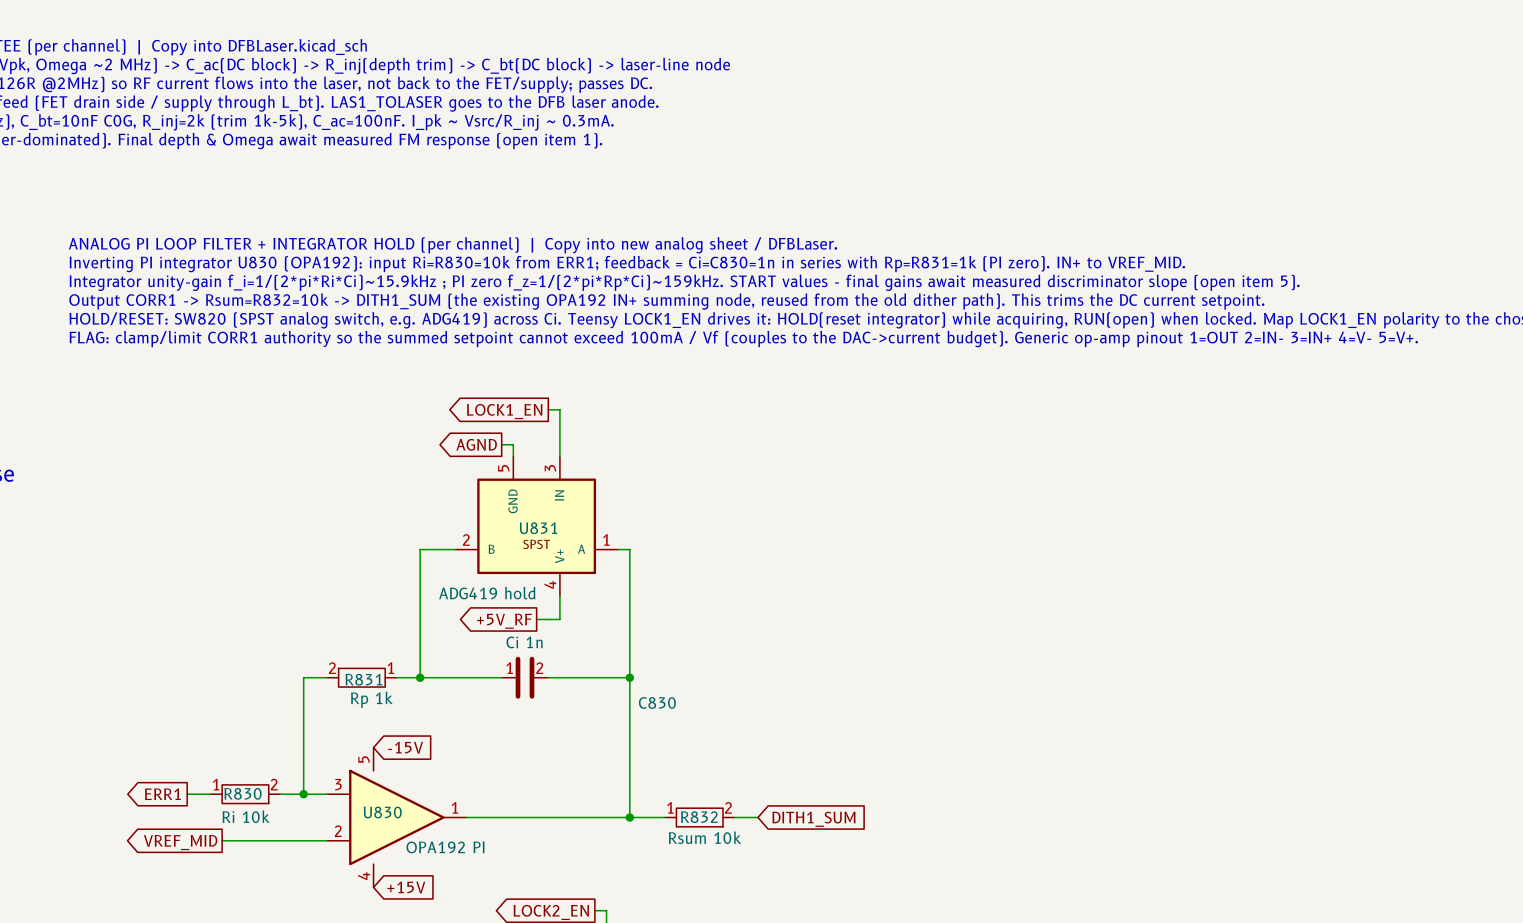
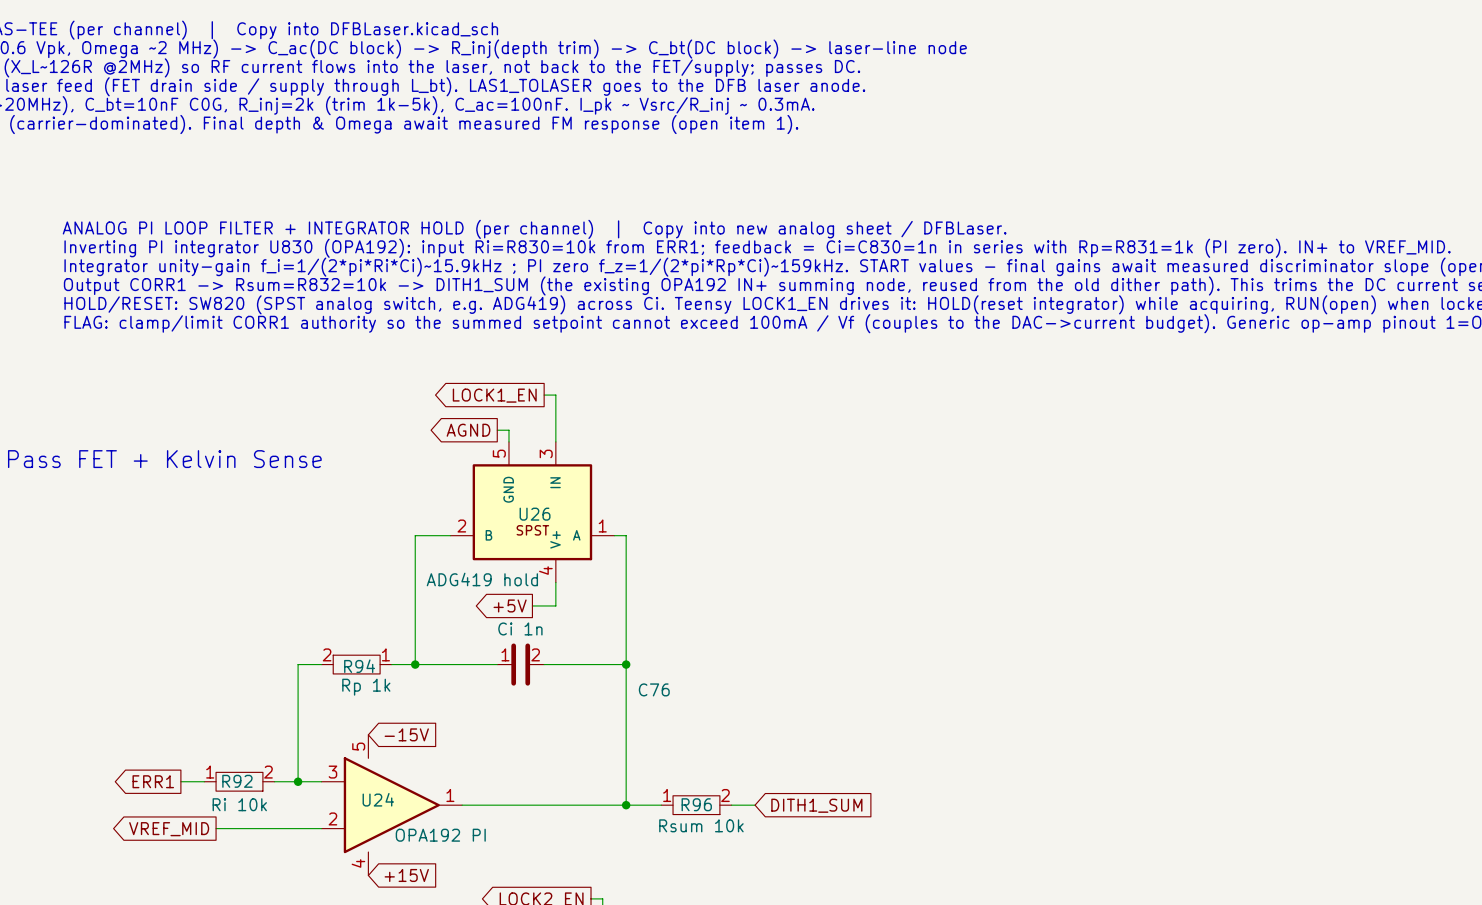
U831 name: U831 (538, 528) -> U26 (535, 514)
global label: +5V_RF (504, 621) -> +5V (510, 605)
R831 name: R831 (363, 679) -> R94 (359, 666)
C830 name: C830 (657, 702) -> C76 (654, 689)
R830 name: R830 (242, 793) -> R92 (237, 781)
U830 name: U830 (382, 812) -> U24 (378, 799)
R832 name: R832 (699, 817) -> R96 (696, 804)

